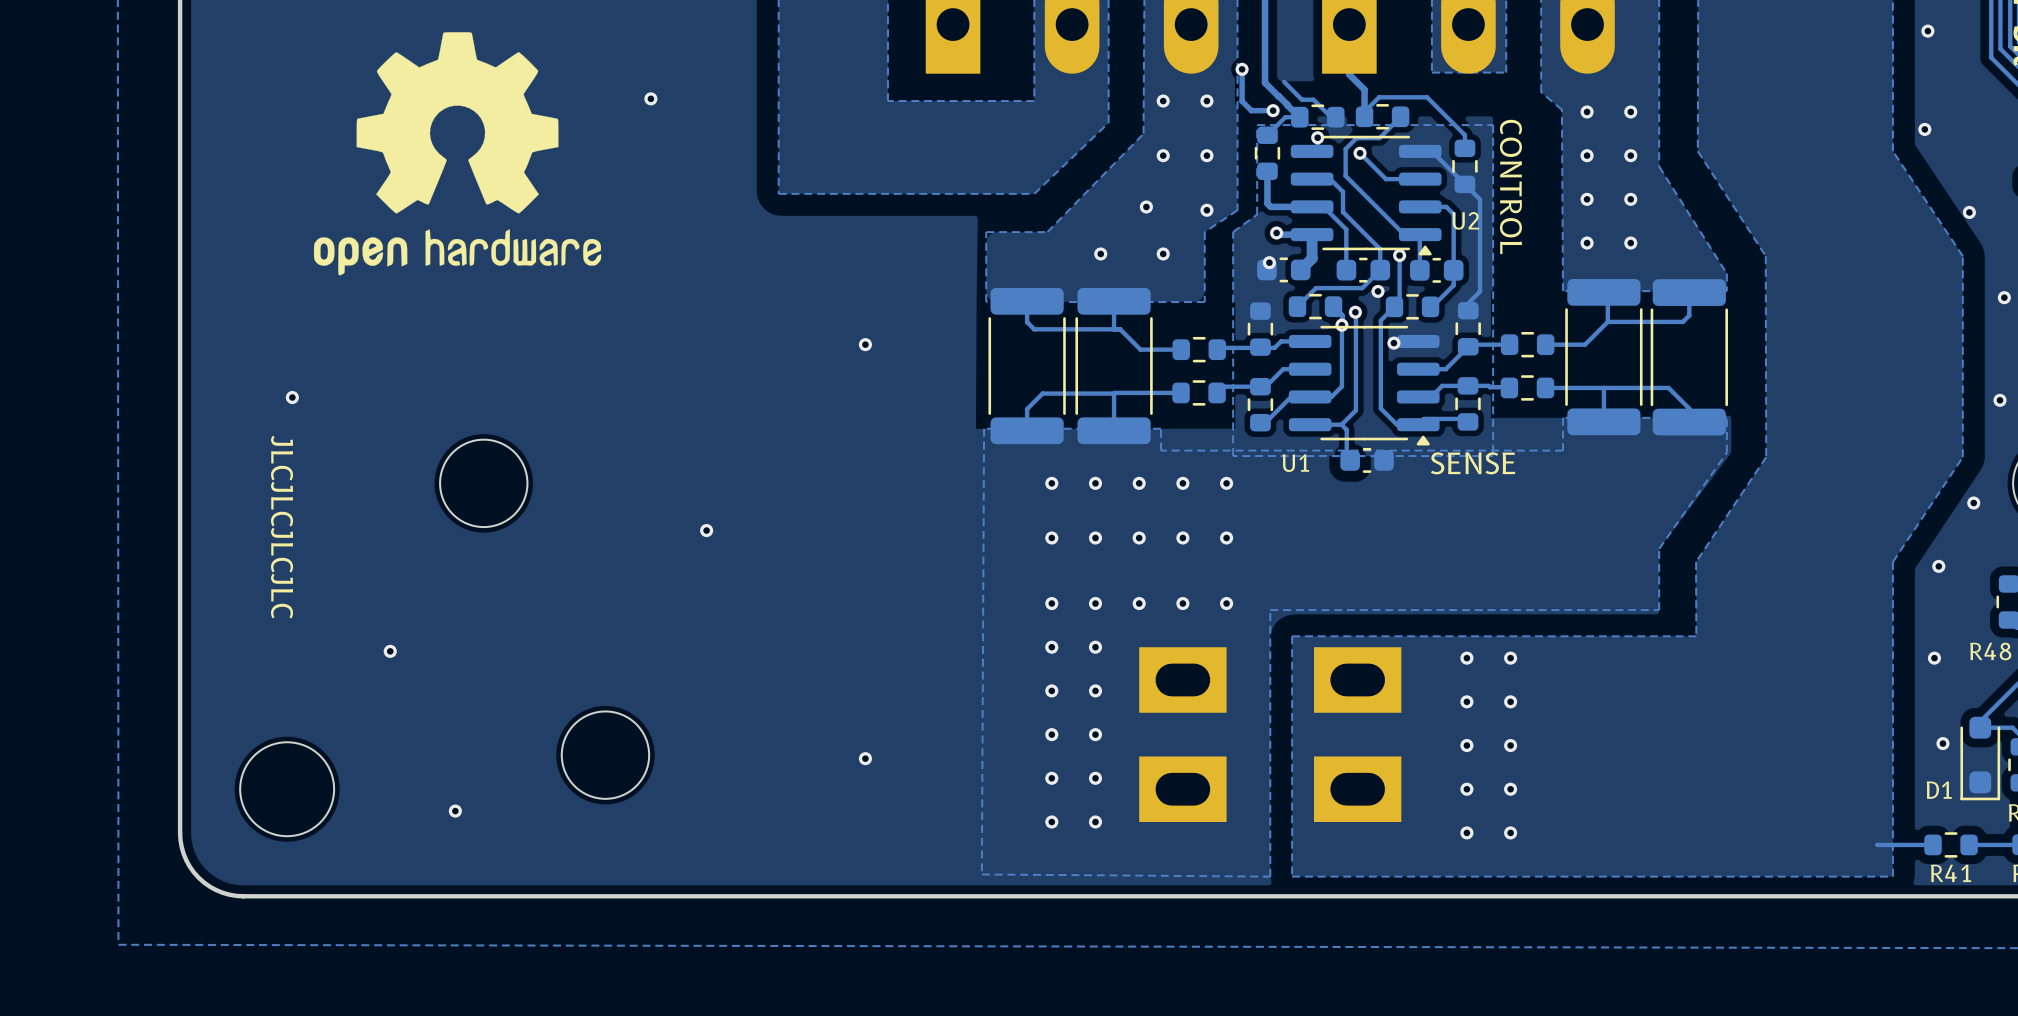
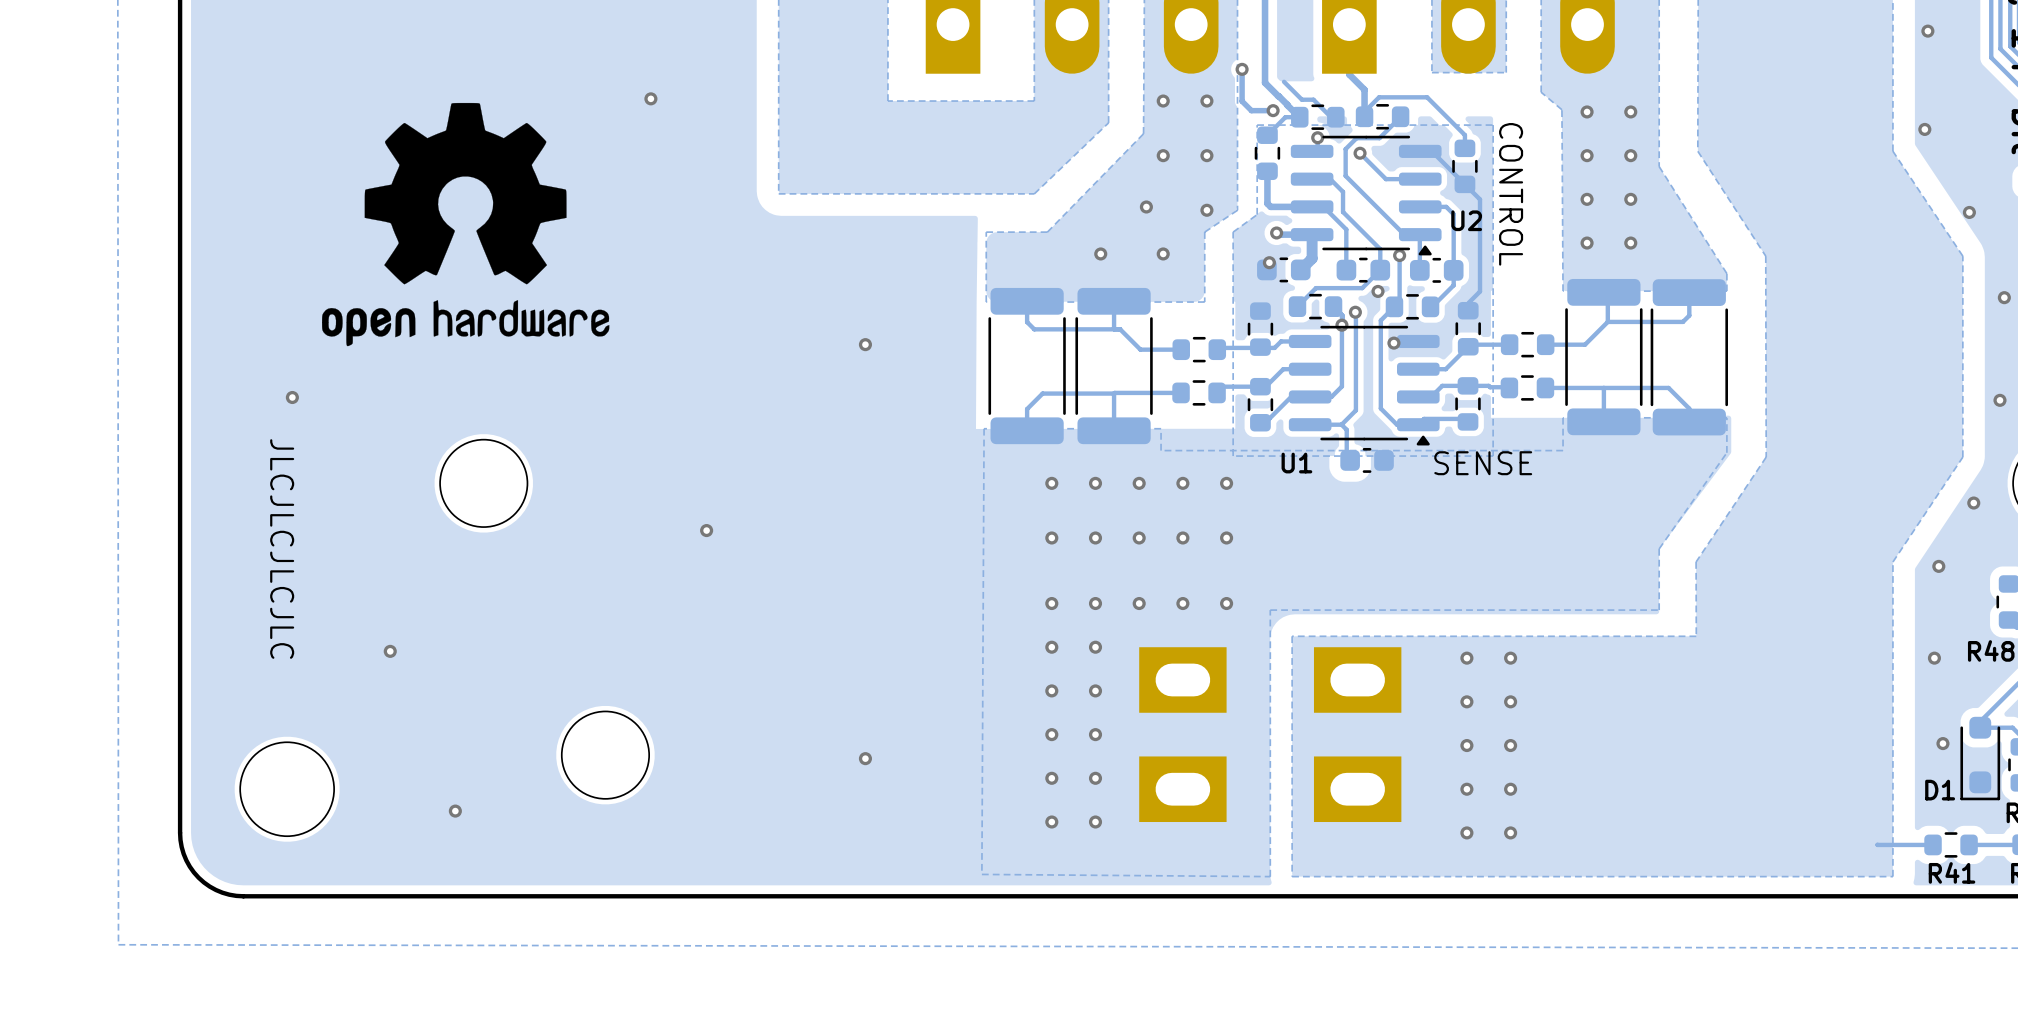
drawing position: (457, 153) -> (465, 224)

